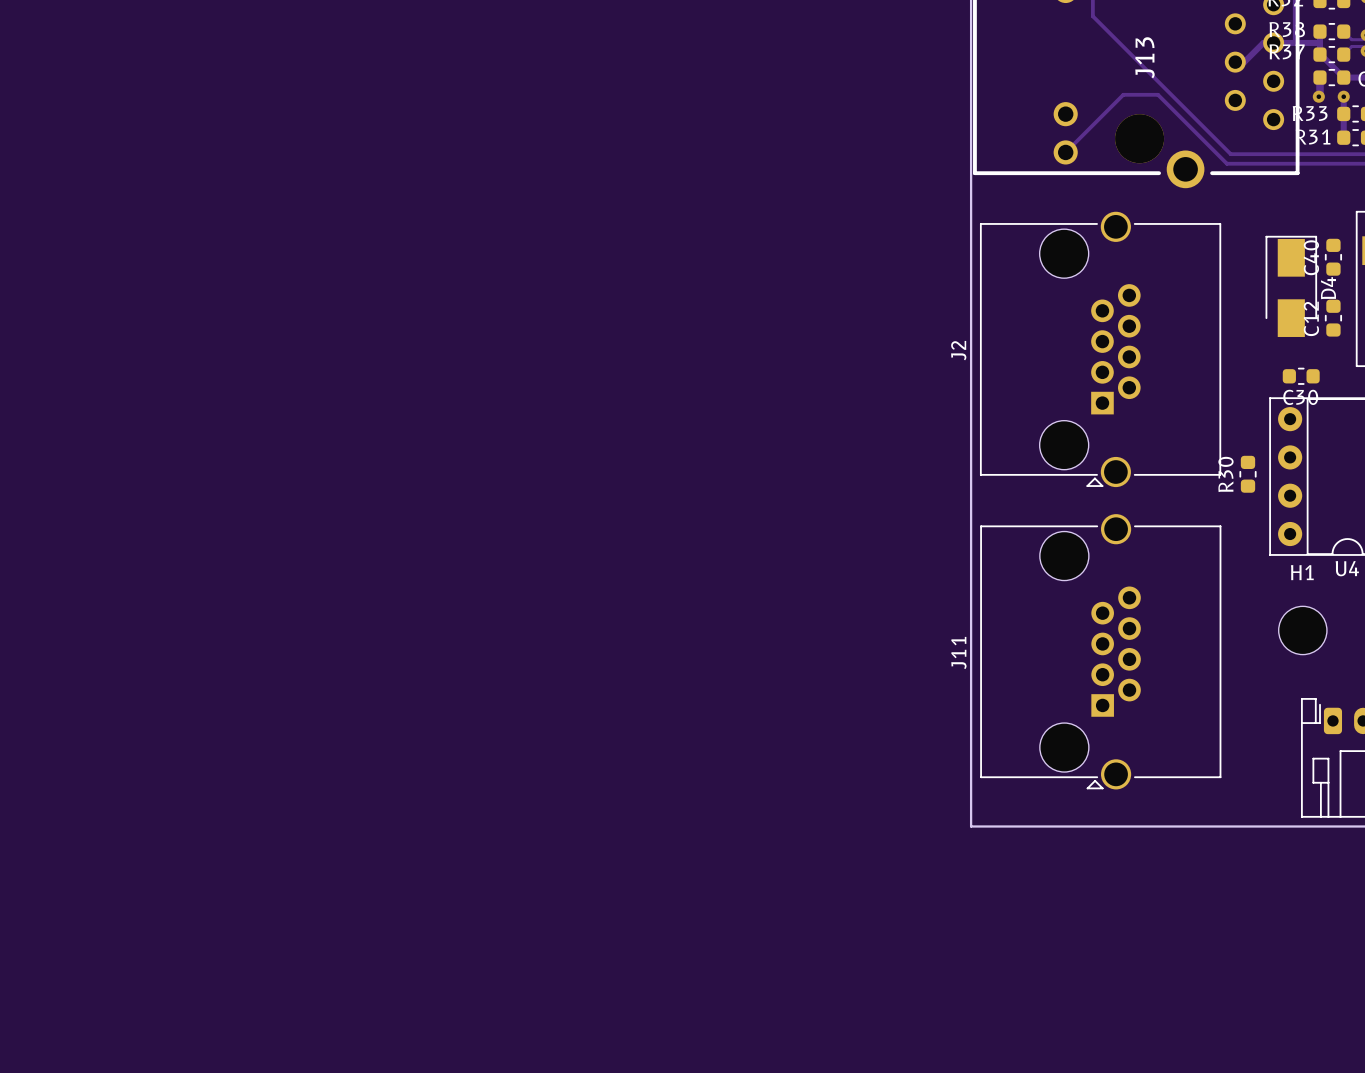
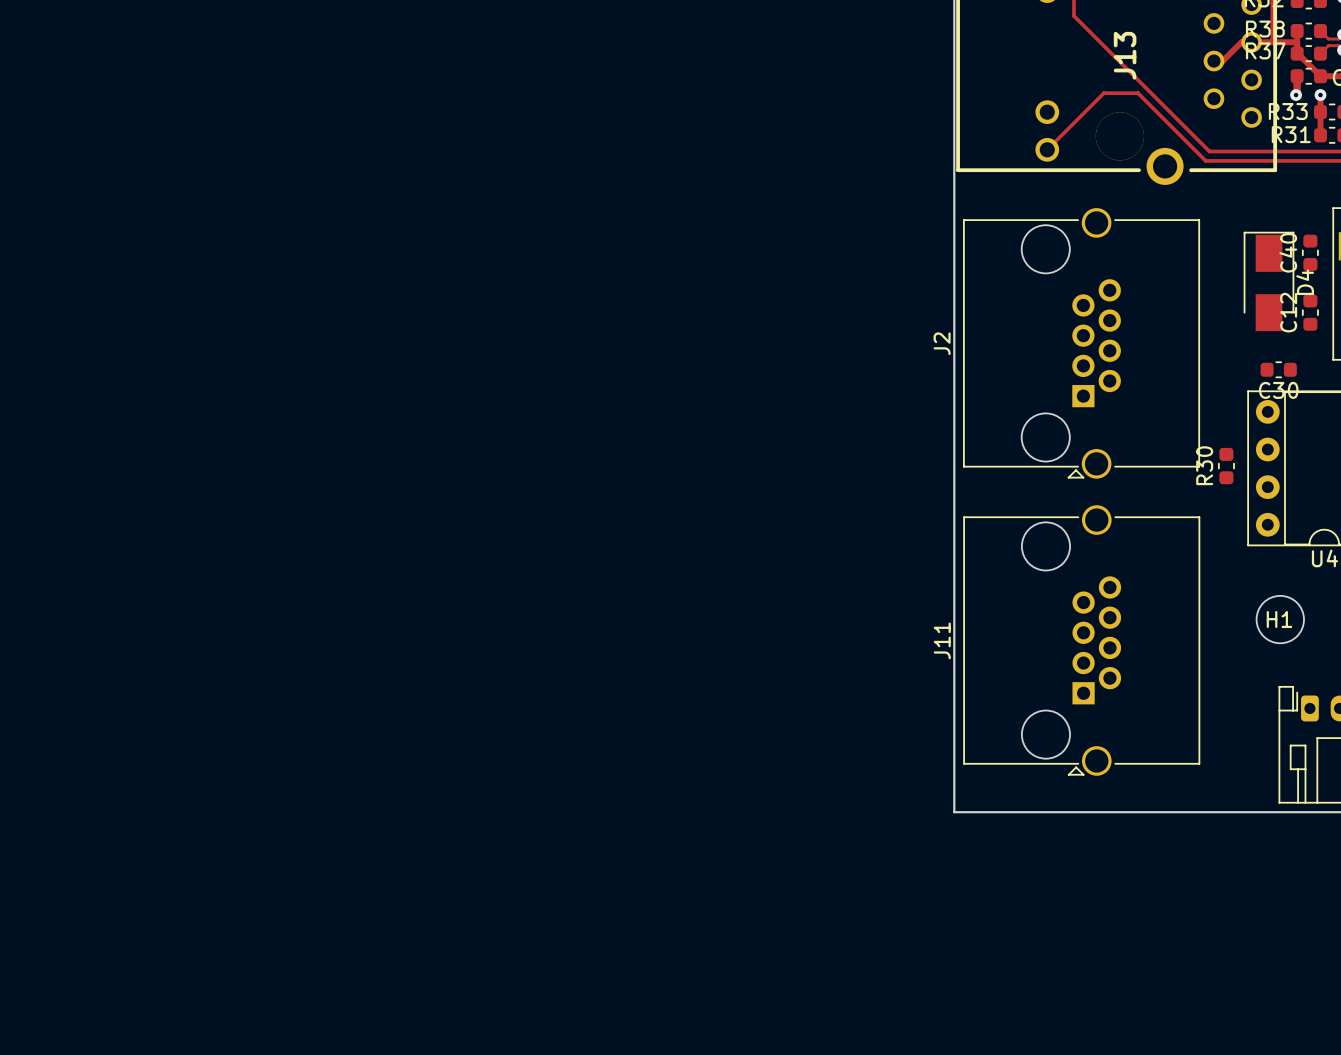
H1 name position: H1 (1302, 572) -> H1 (1279, 619)

